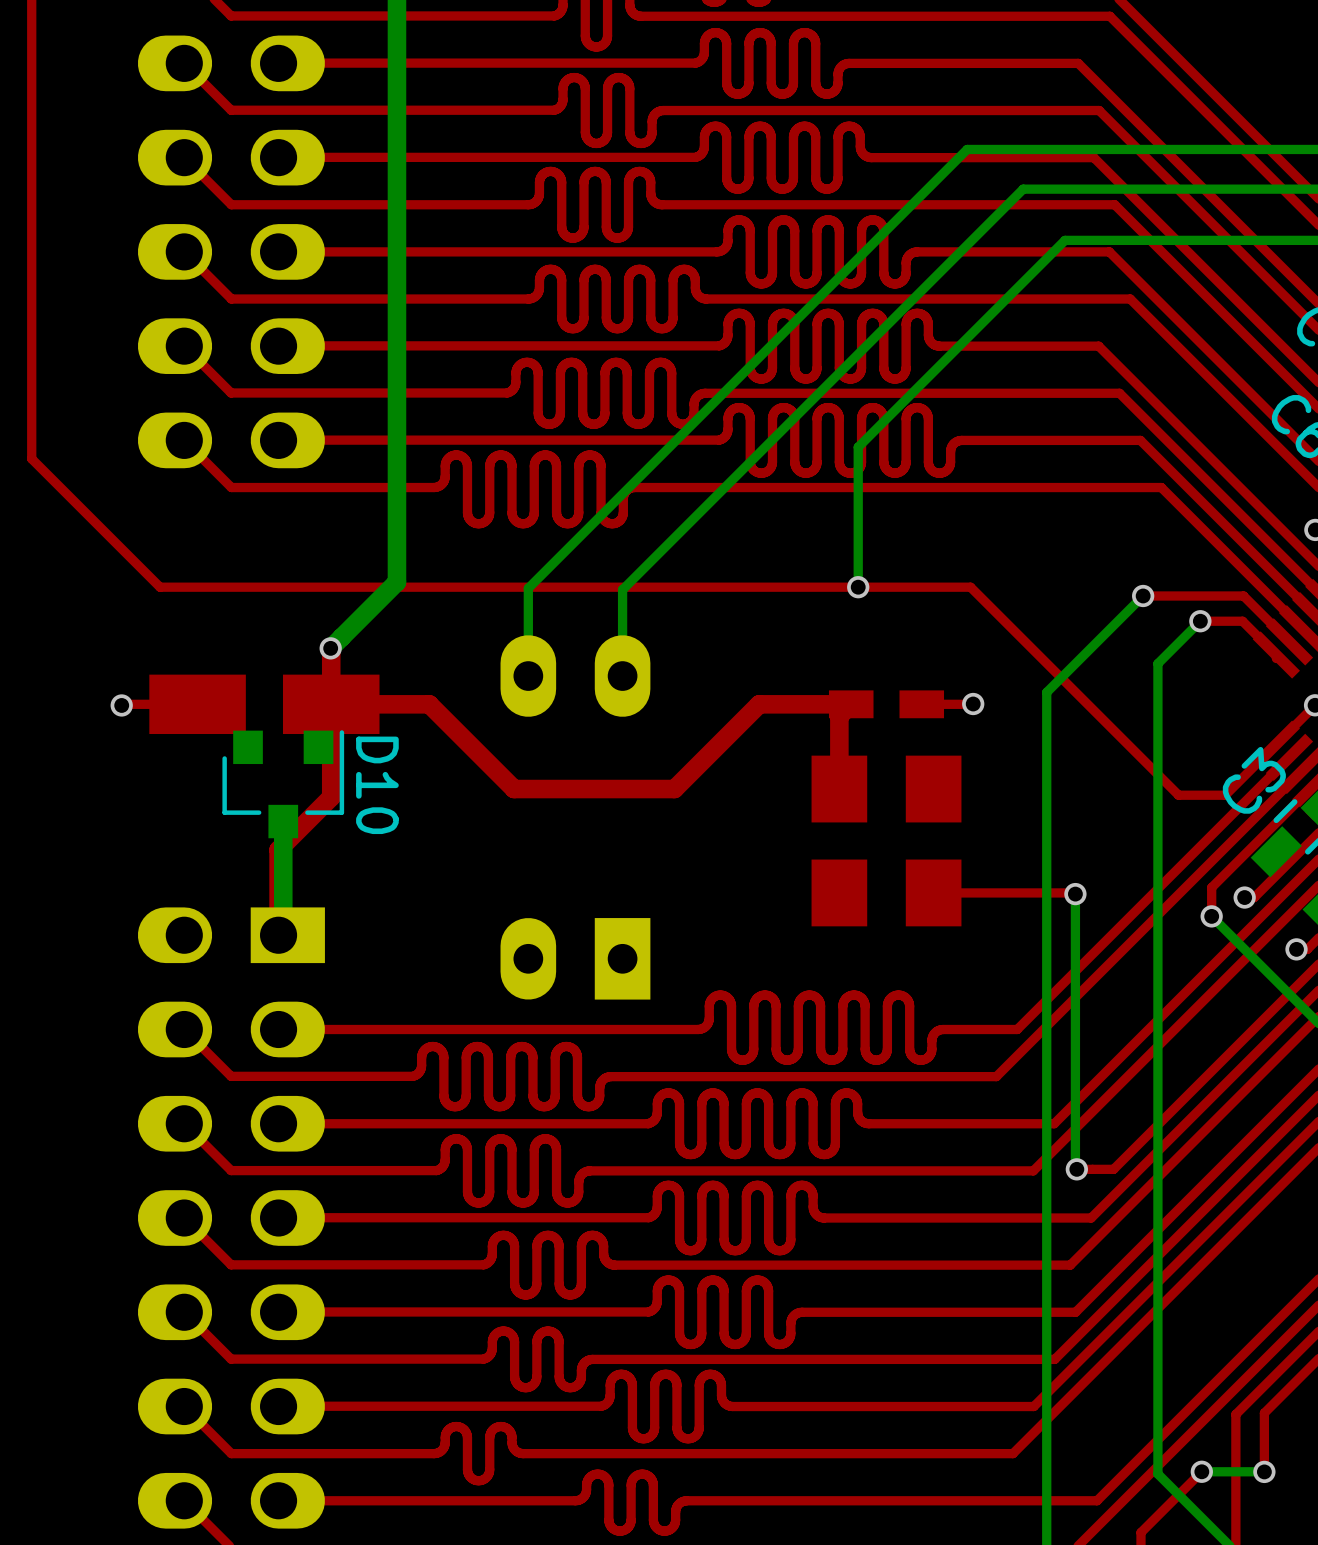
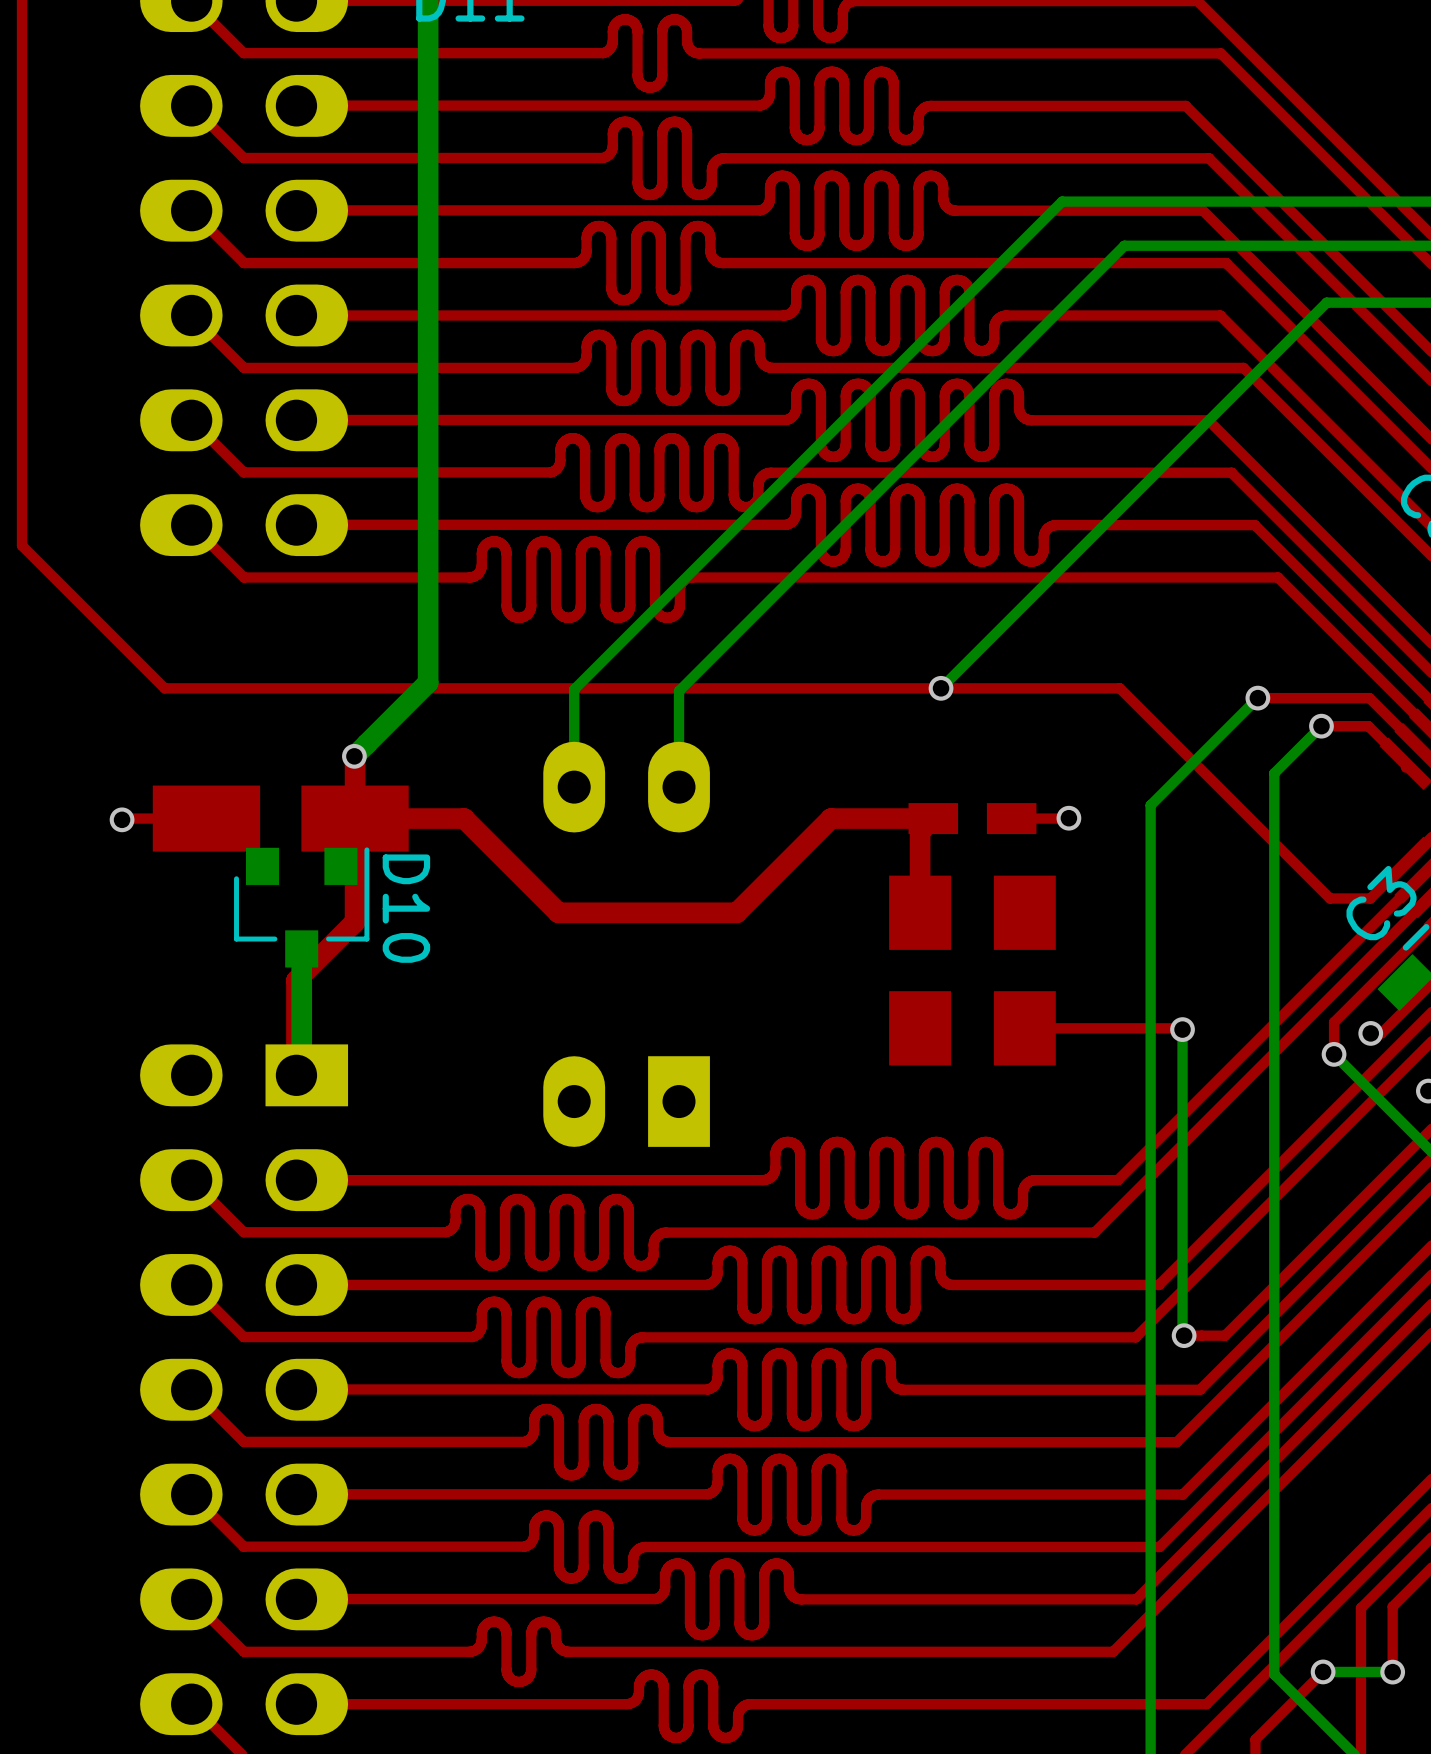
bottom track: (1205, 240) (1065, 240) (858, 447) (858, 587) -> (1326, 302) (941, 688)
top track: (970, 587) (1178, 795) (1225, 795) (1244, 776) -> (1065, 688) (1119, 688) (1330, 898) (1370, 898)

